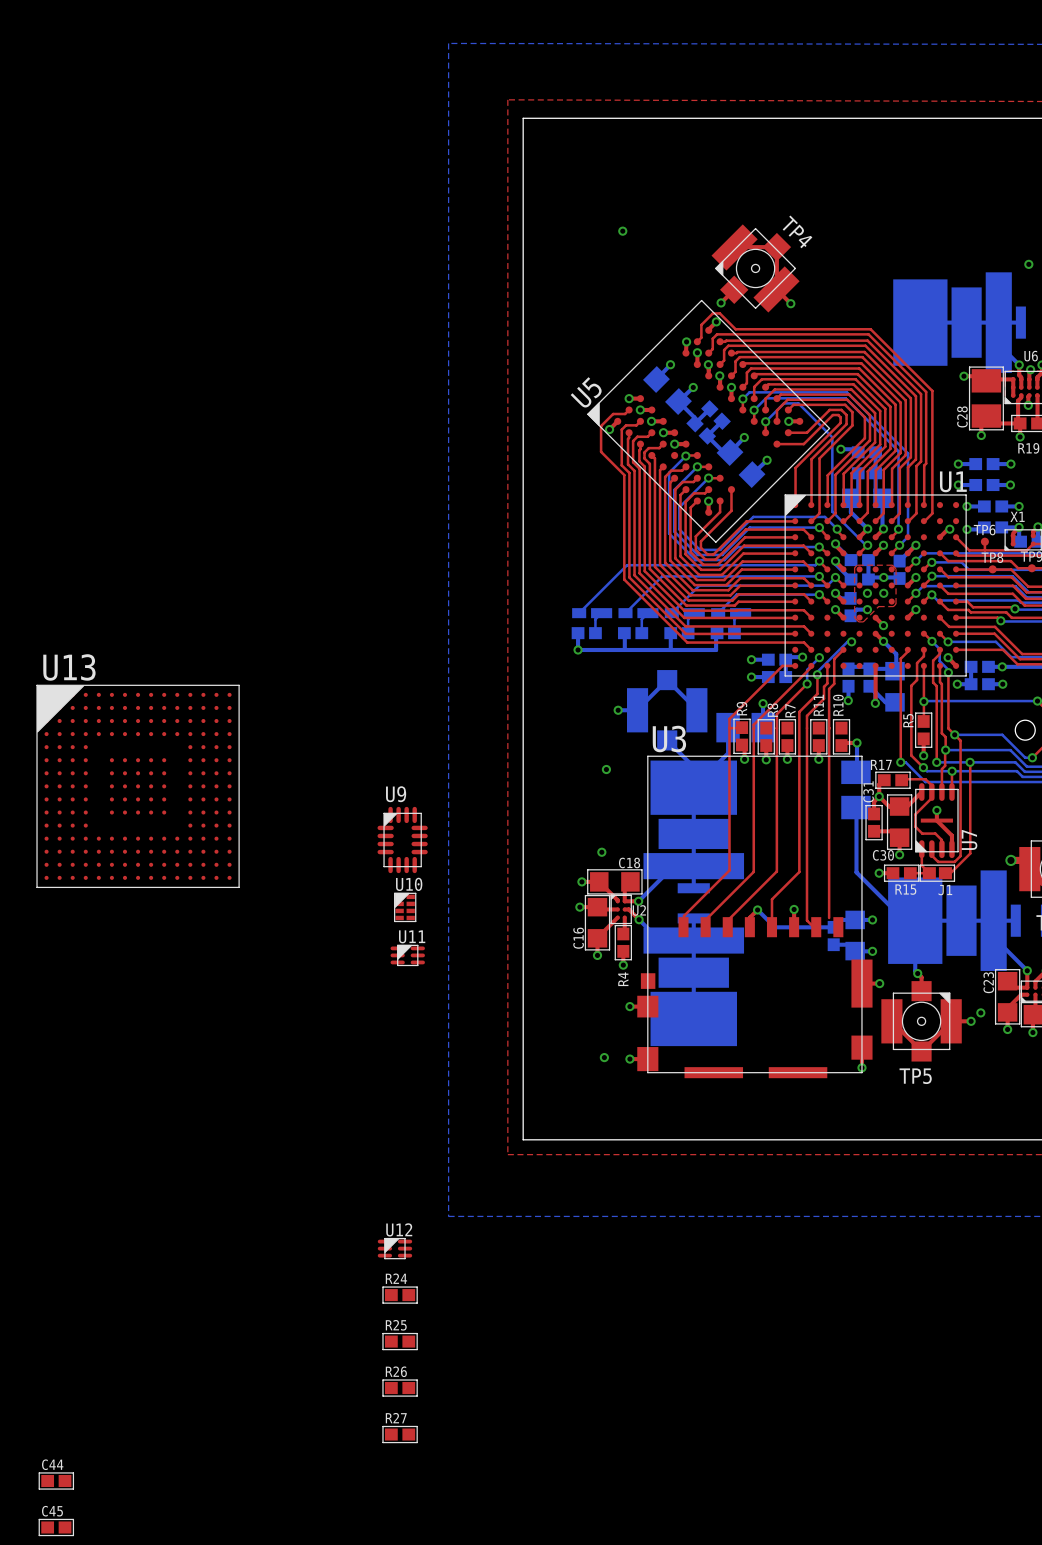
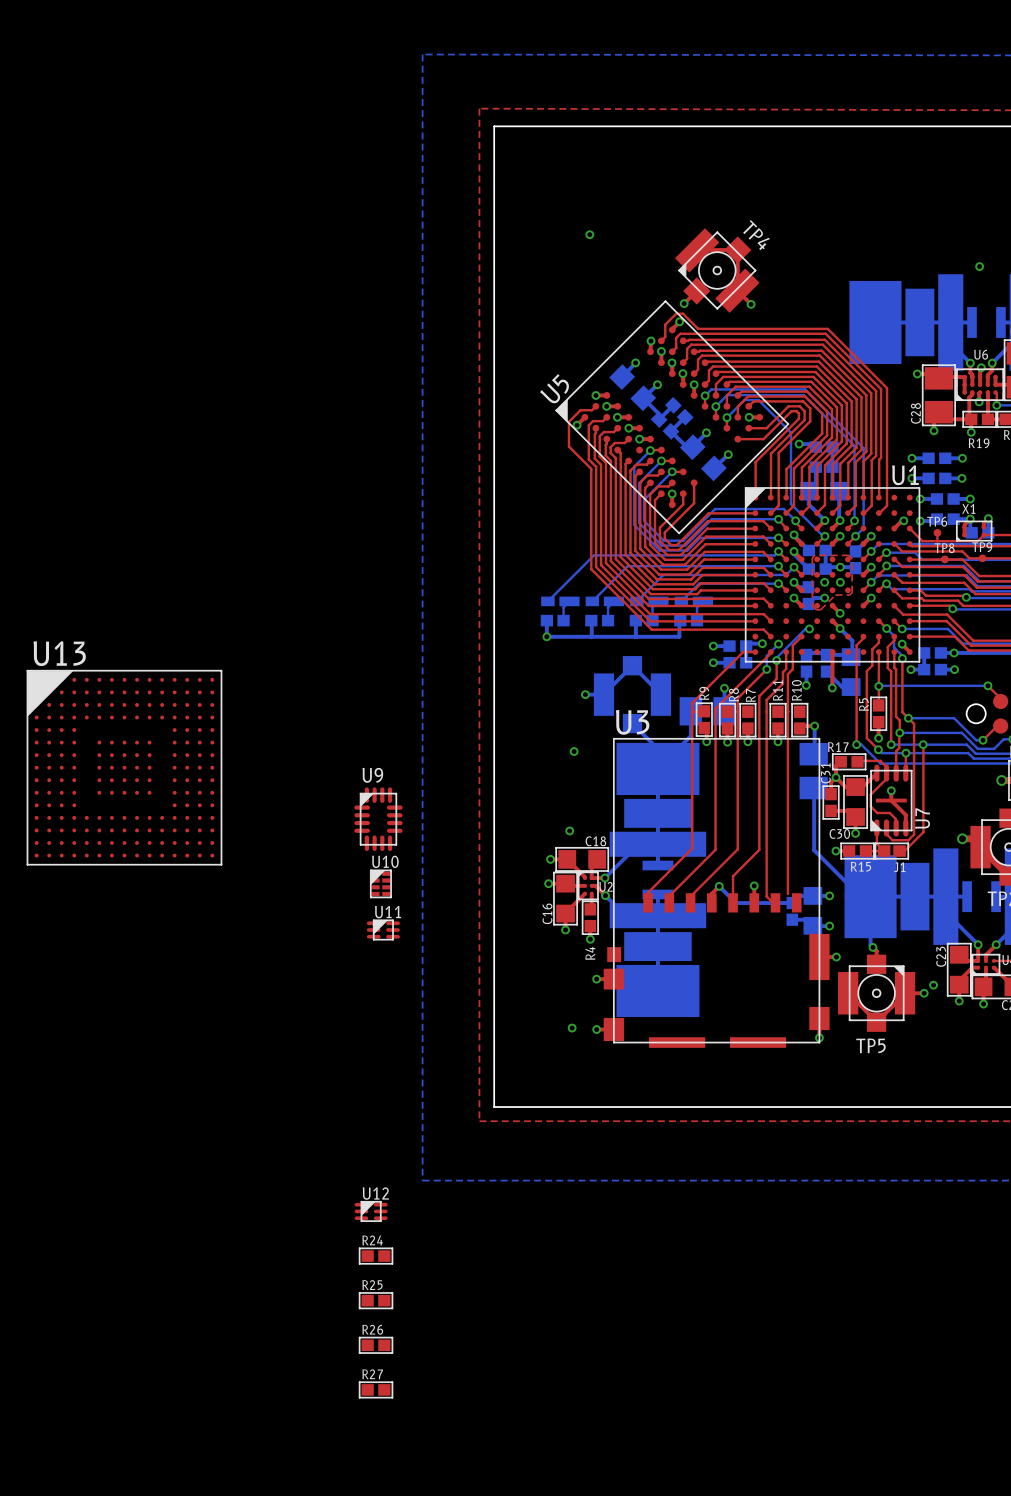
C44: (56, 1481) -> none
C45: (56, 1527) -> none

